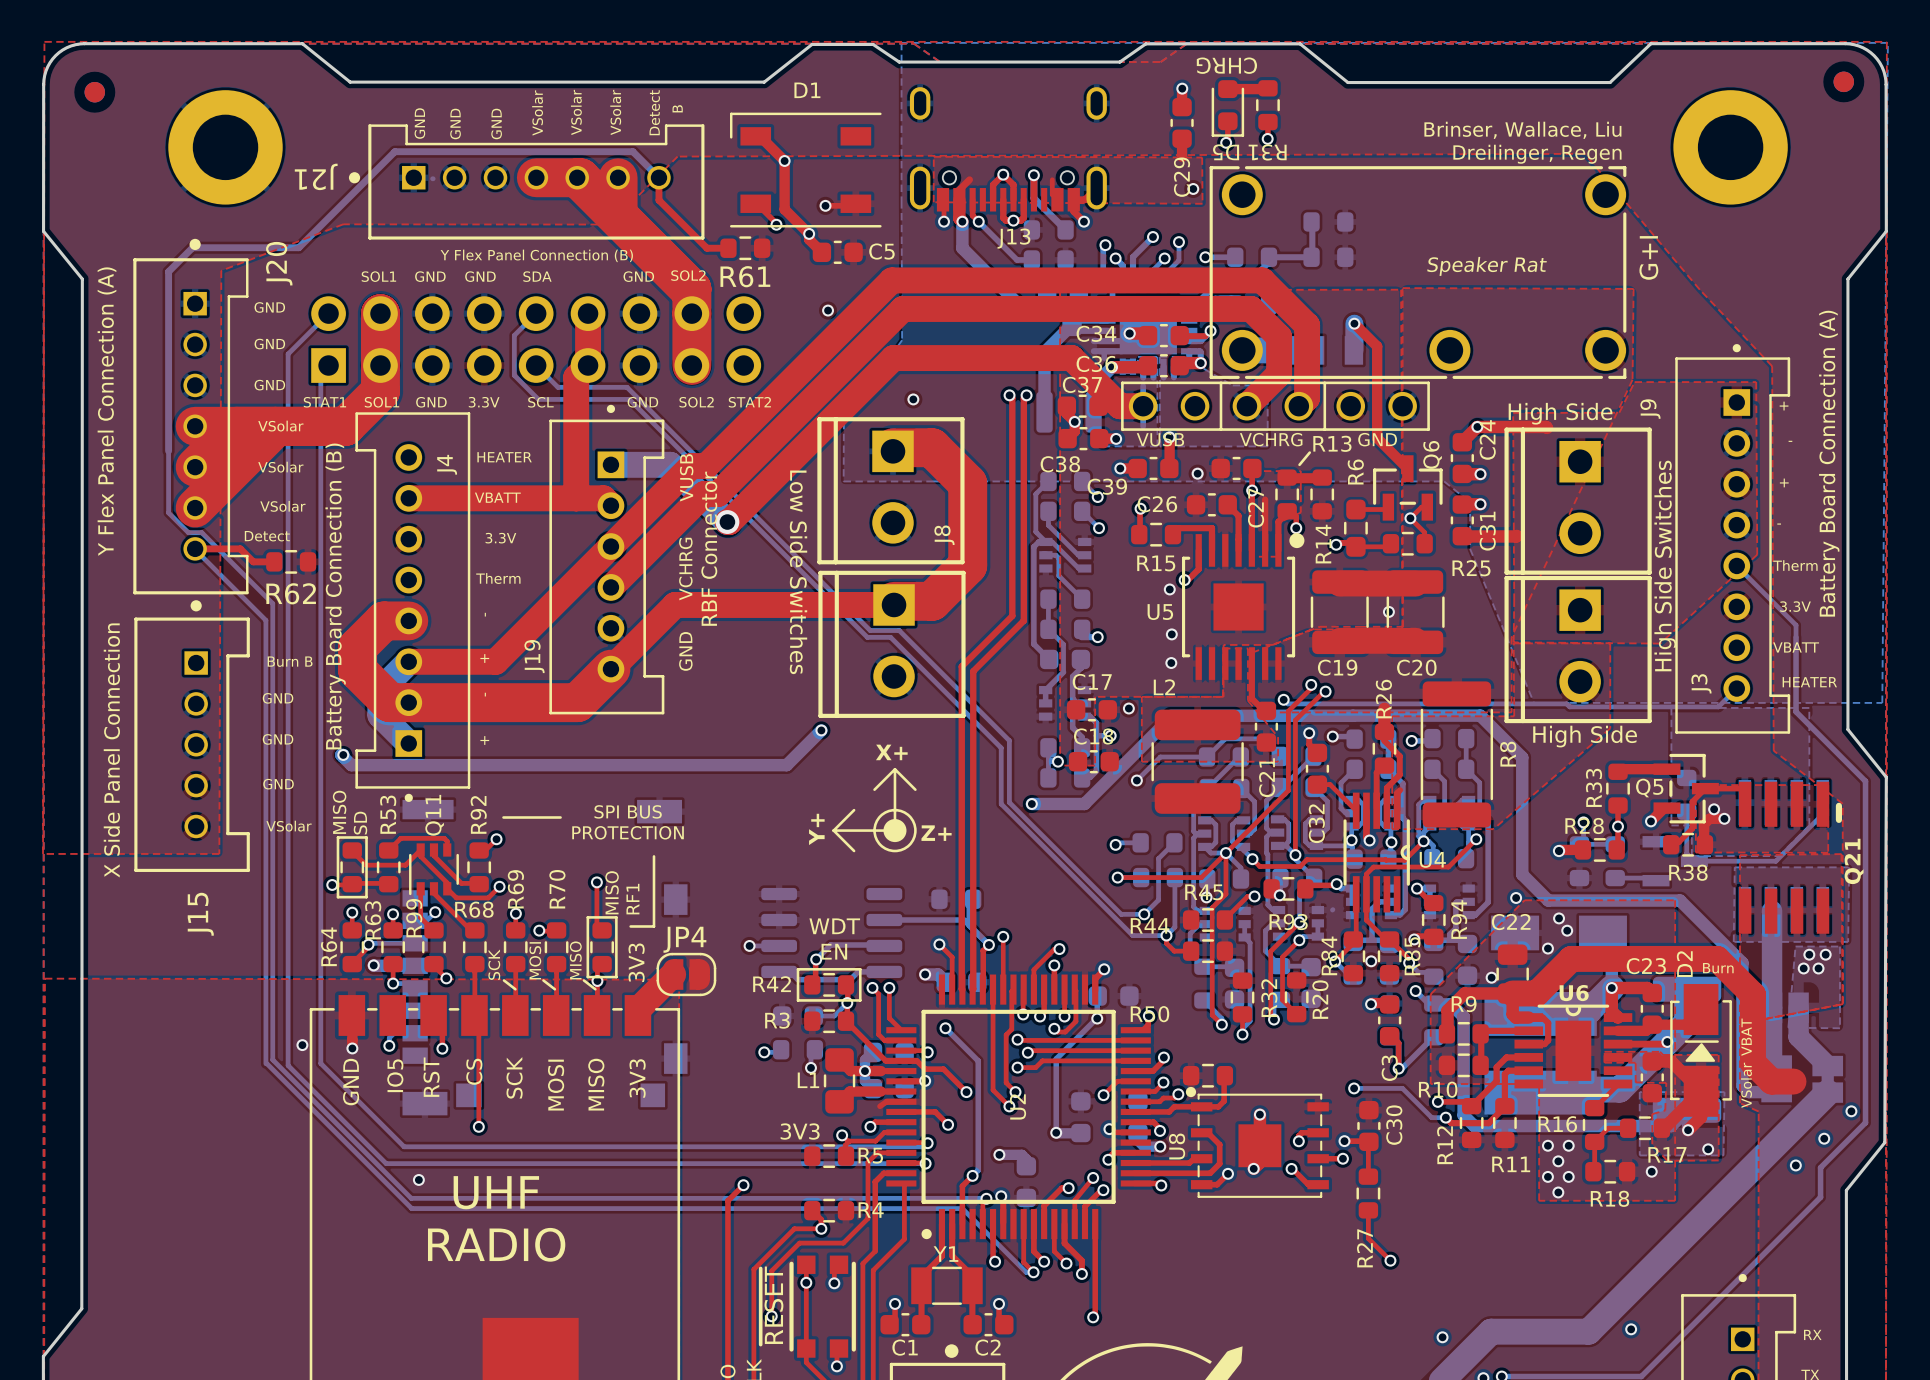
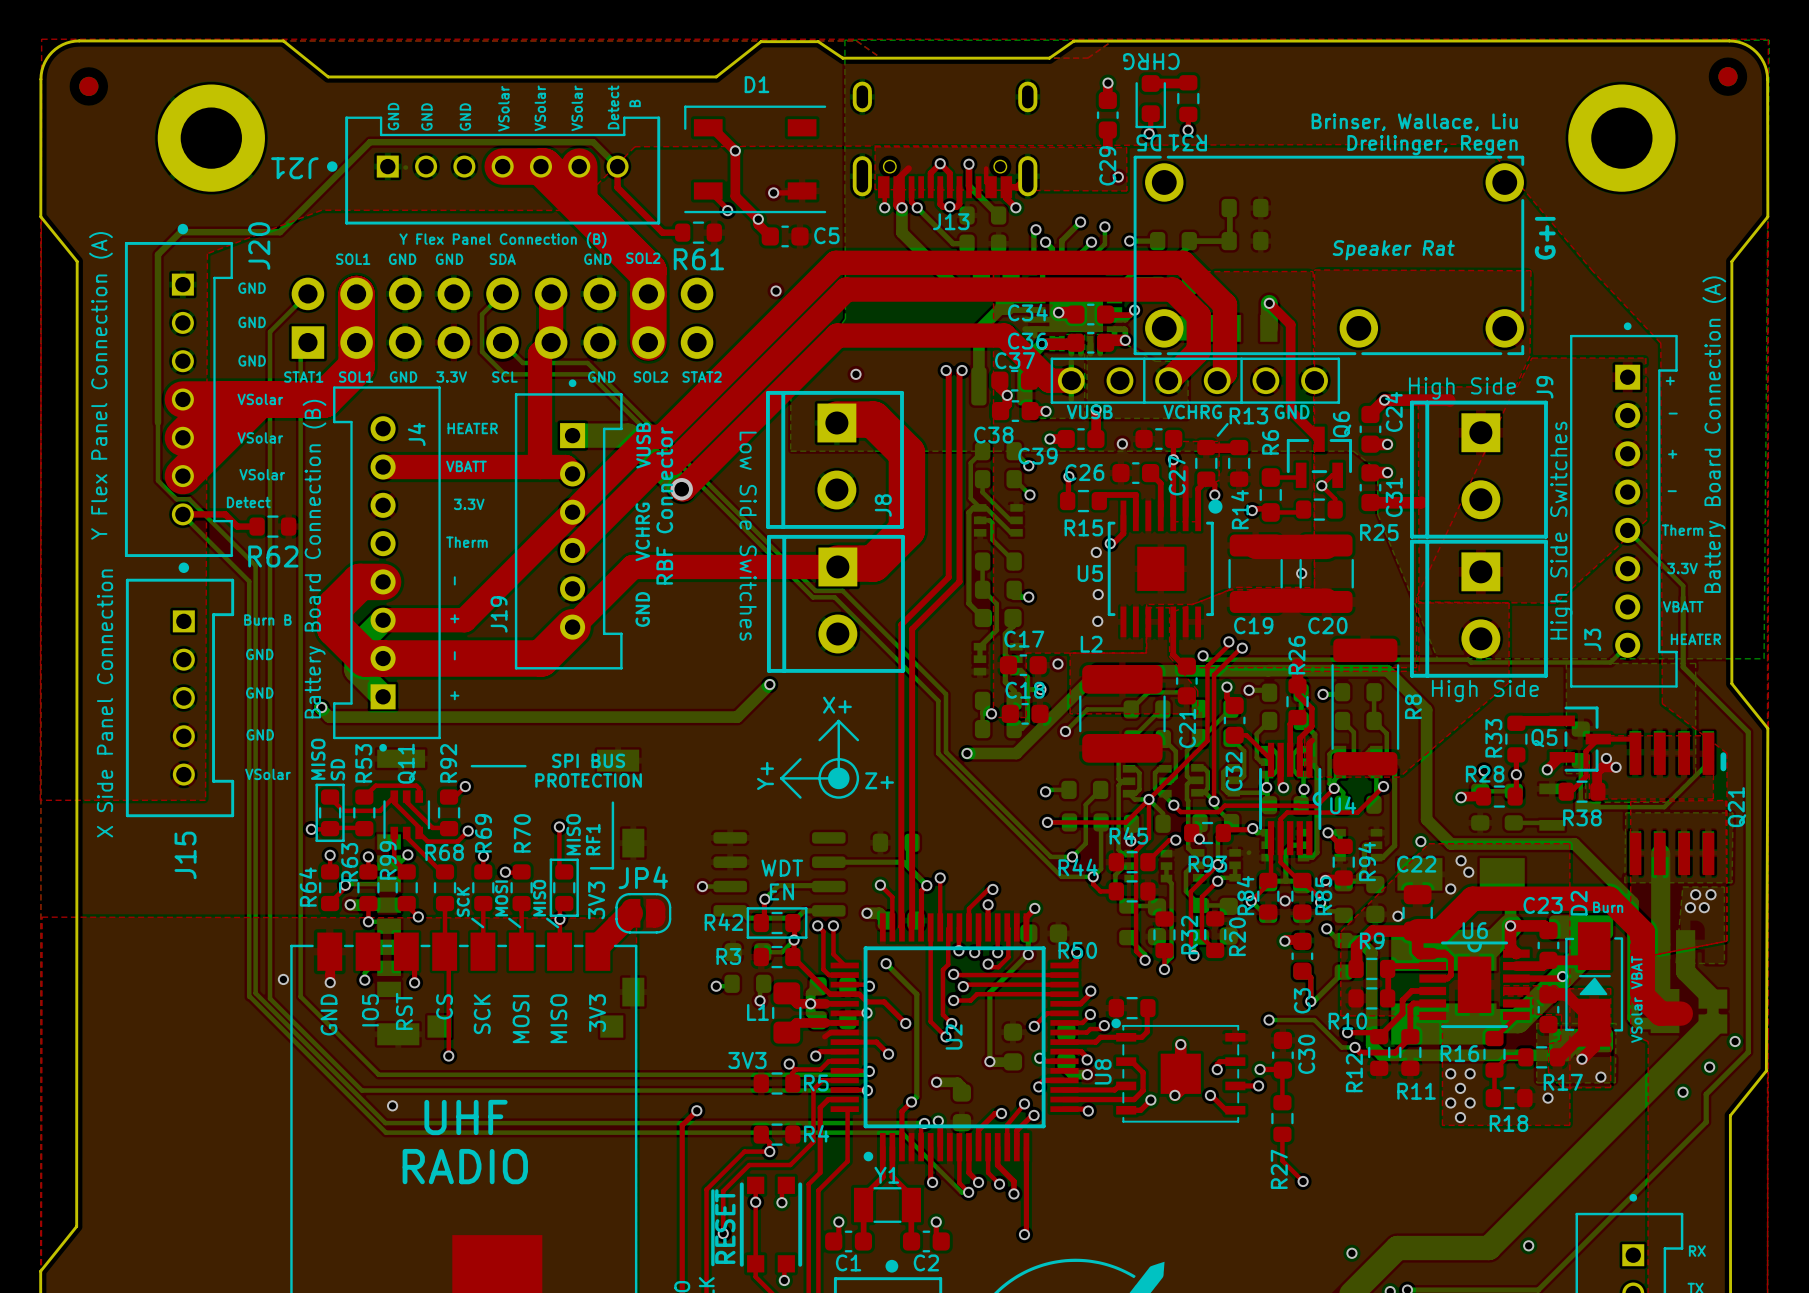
board edge: (1845, 43) (1650, 43) (1610, 82) (1347, 82) (1300, 43) (1145, 43) -> (1729, 40) (1073, 41)

